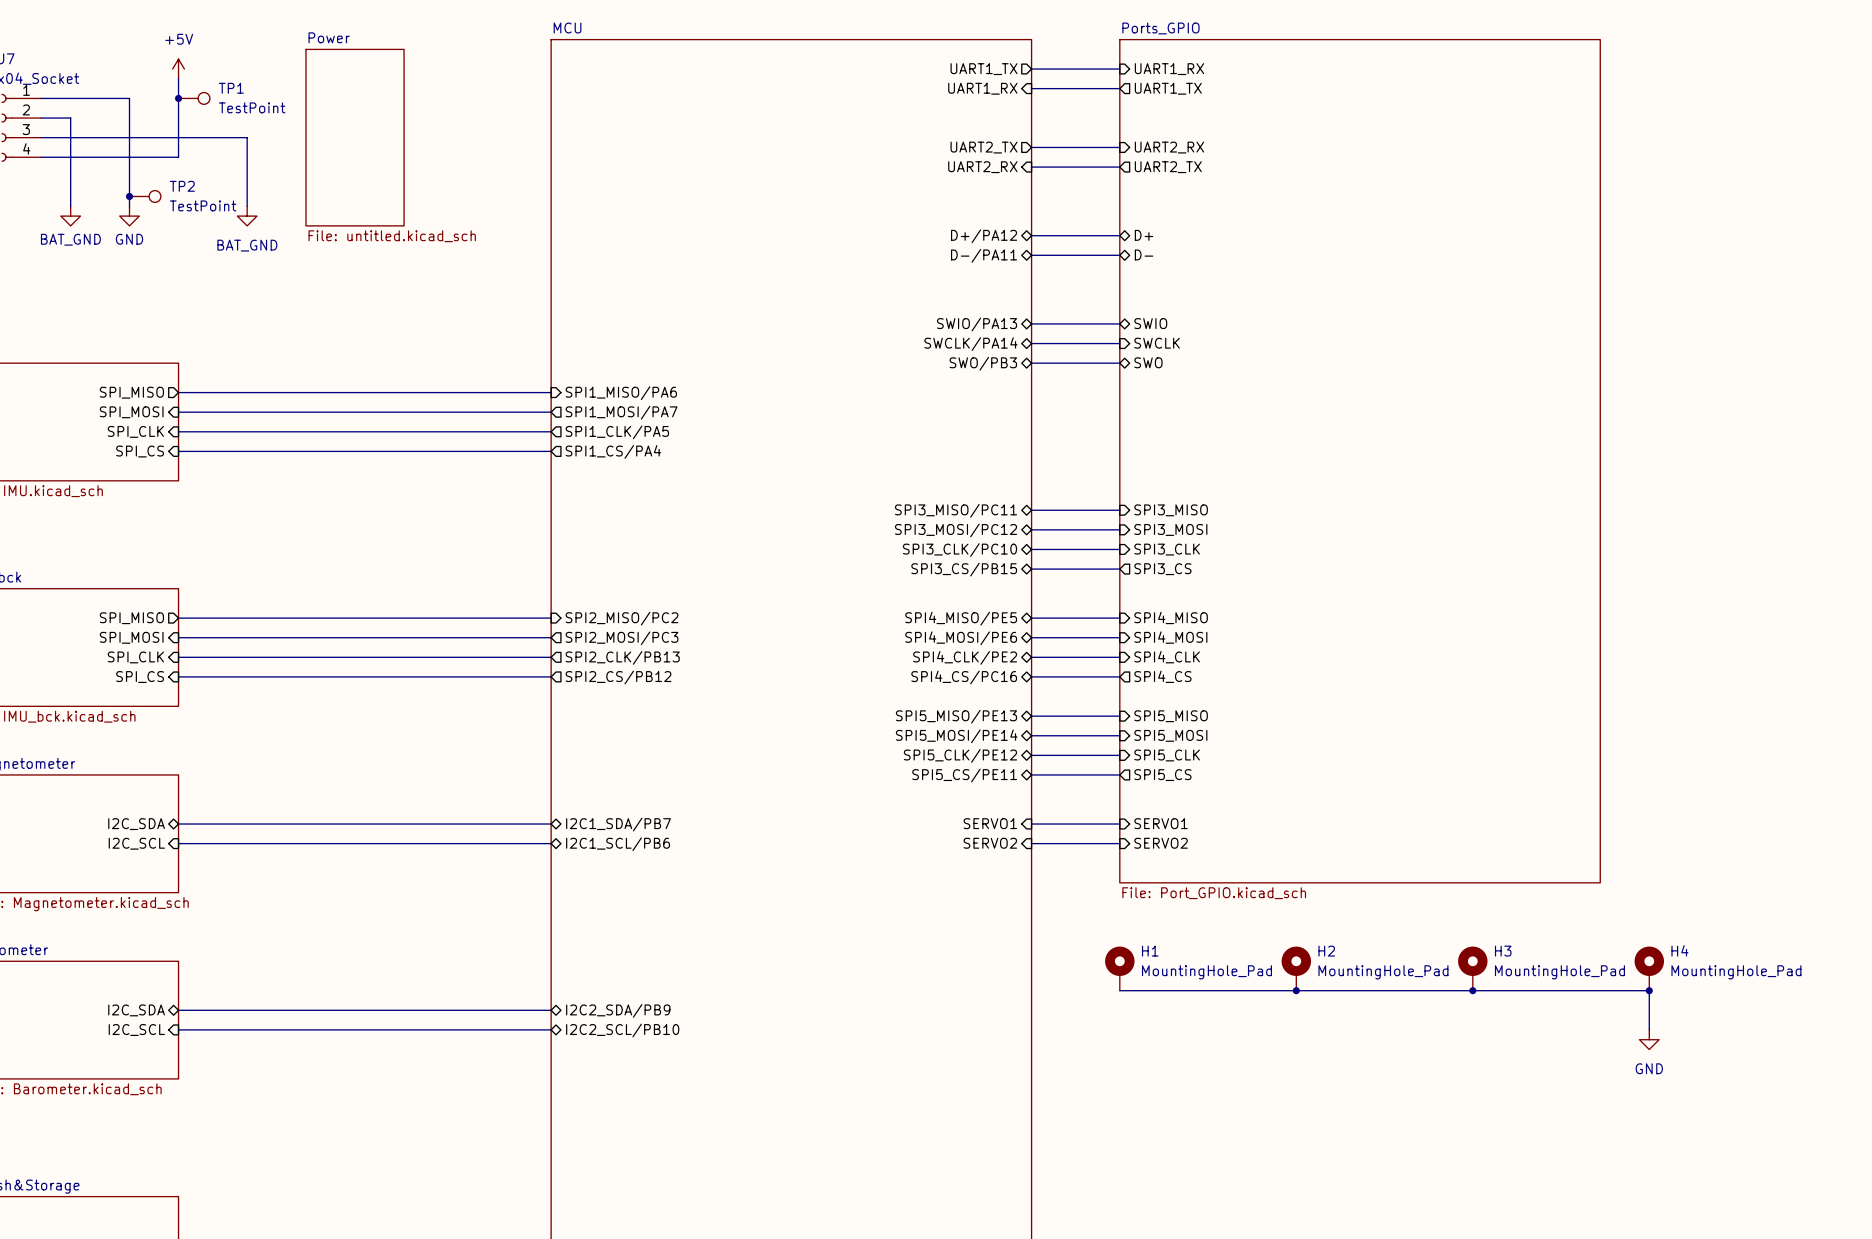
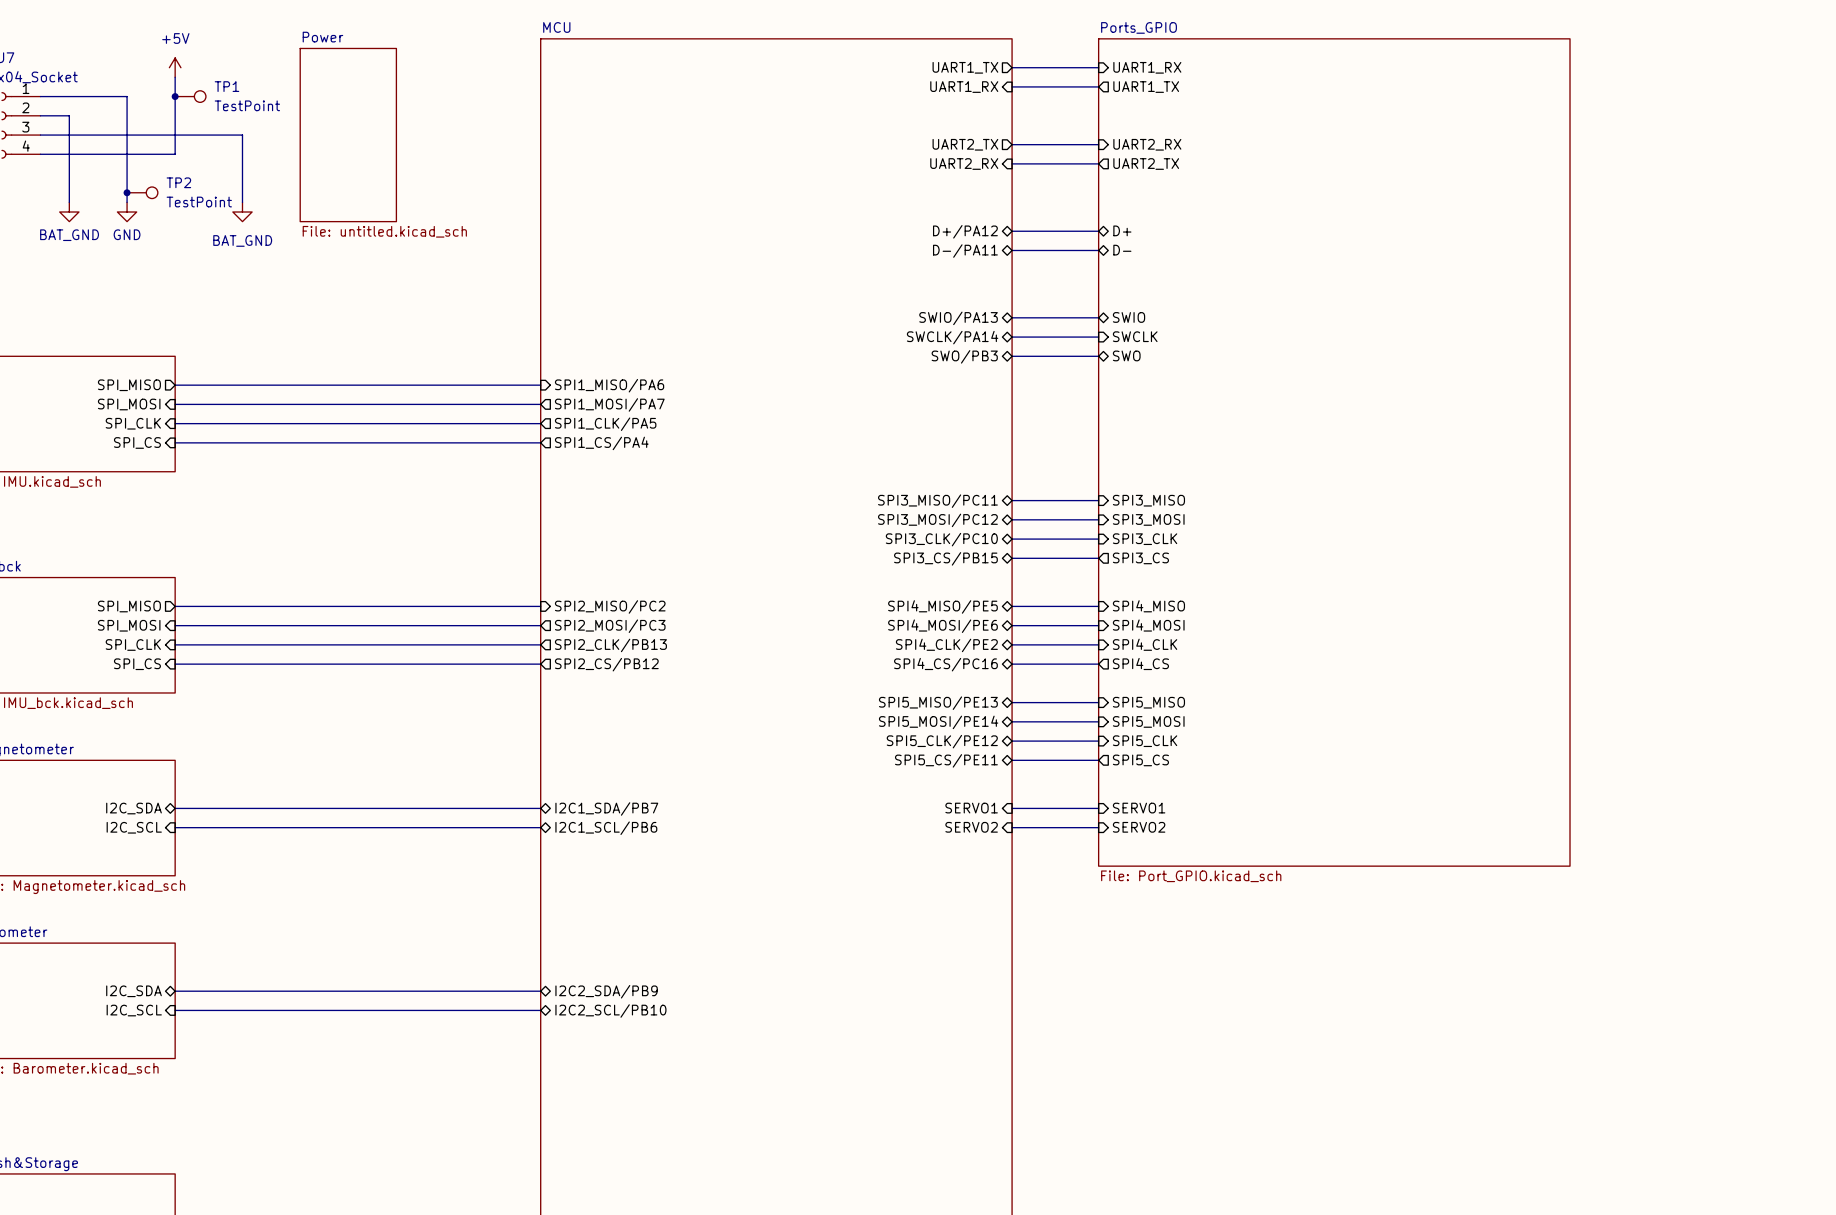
H1: MountingHole_Pad (1119, 968) -> none
H2: MountingHole_Pad (1296, 968) -> none
H3: MountingHole_Pad (1472, 968) -> none
H4: MountingHole_Pad (1649, 968) -> none
wire: (1119, 990) (1649, 990) (1649, 1029) -> none
junction: (1296, 990) -> none
junction: (1472, 990) -> none
junction: (1649, 990) -> none
power symbol: GND (1649, 1039) -> none

